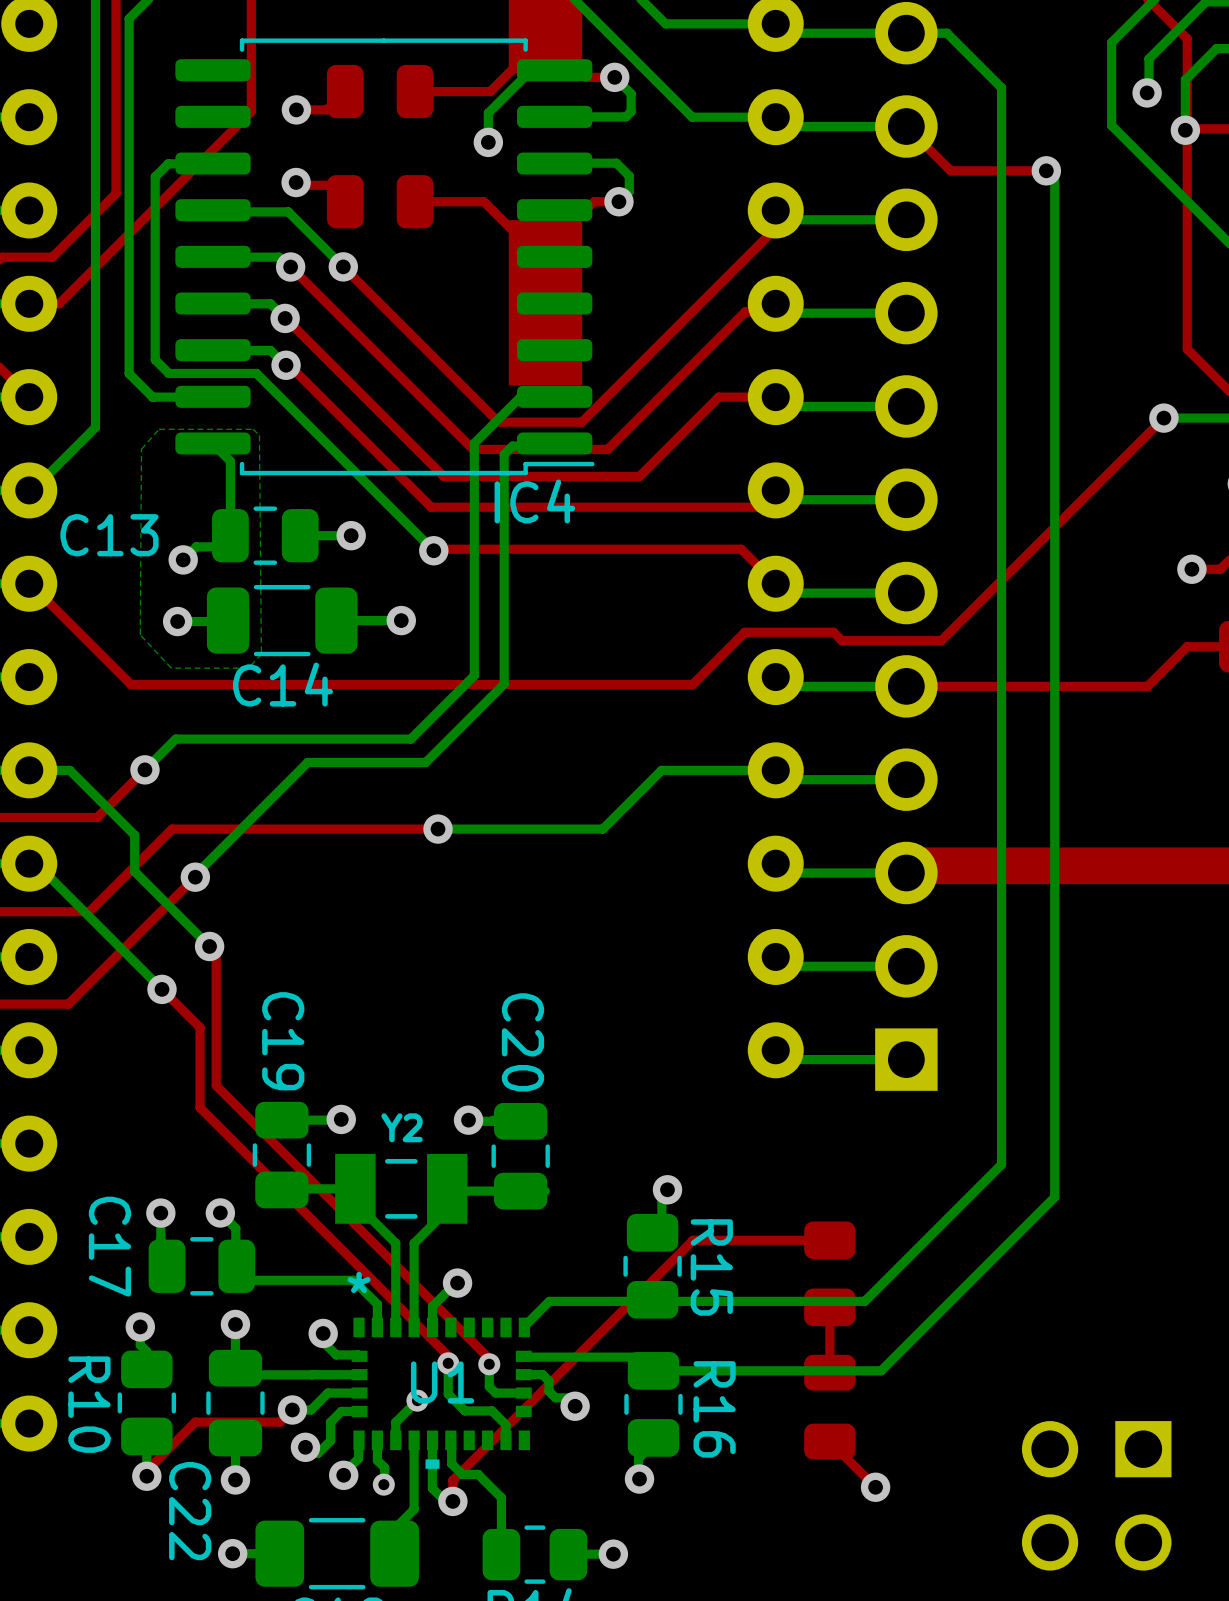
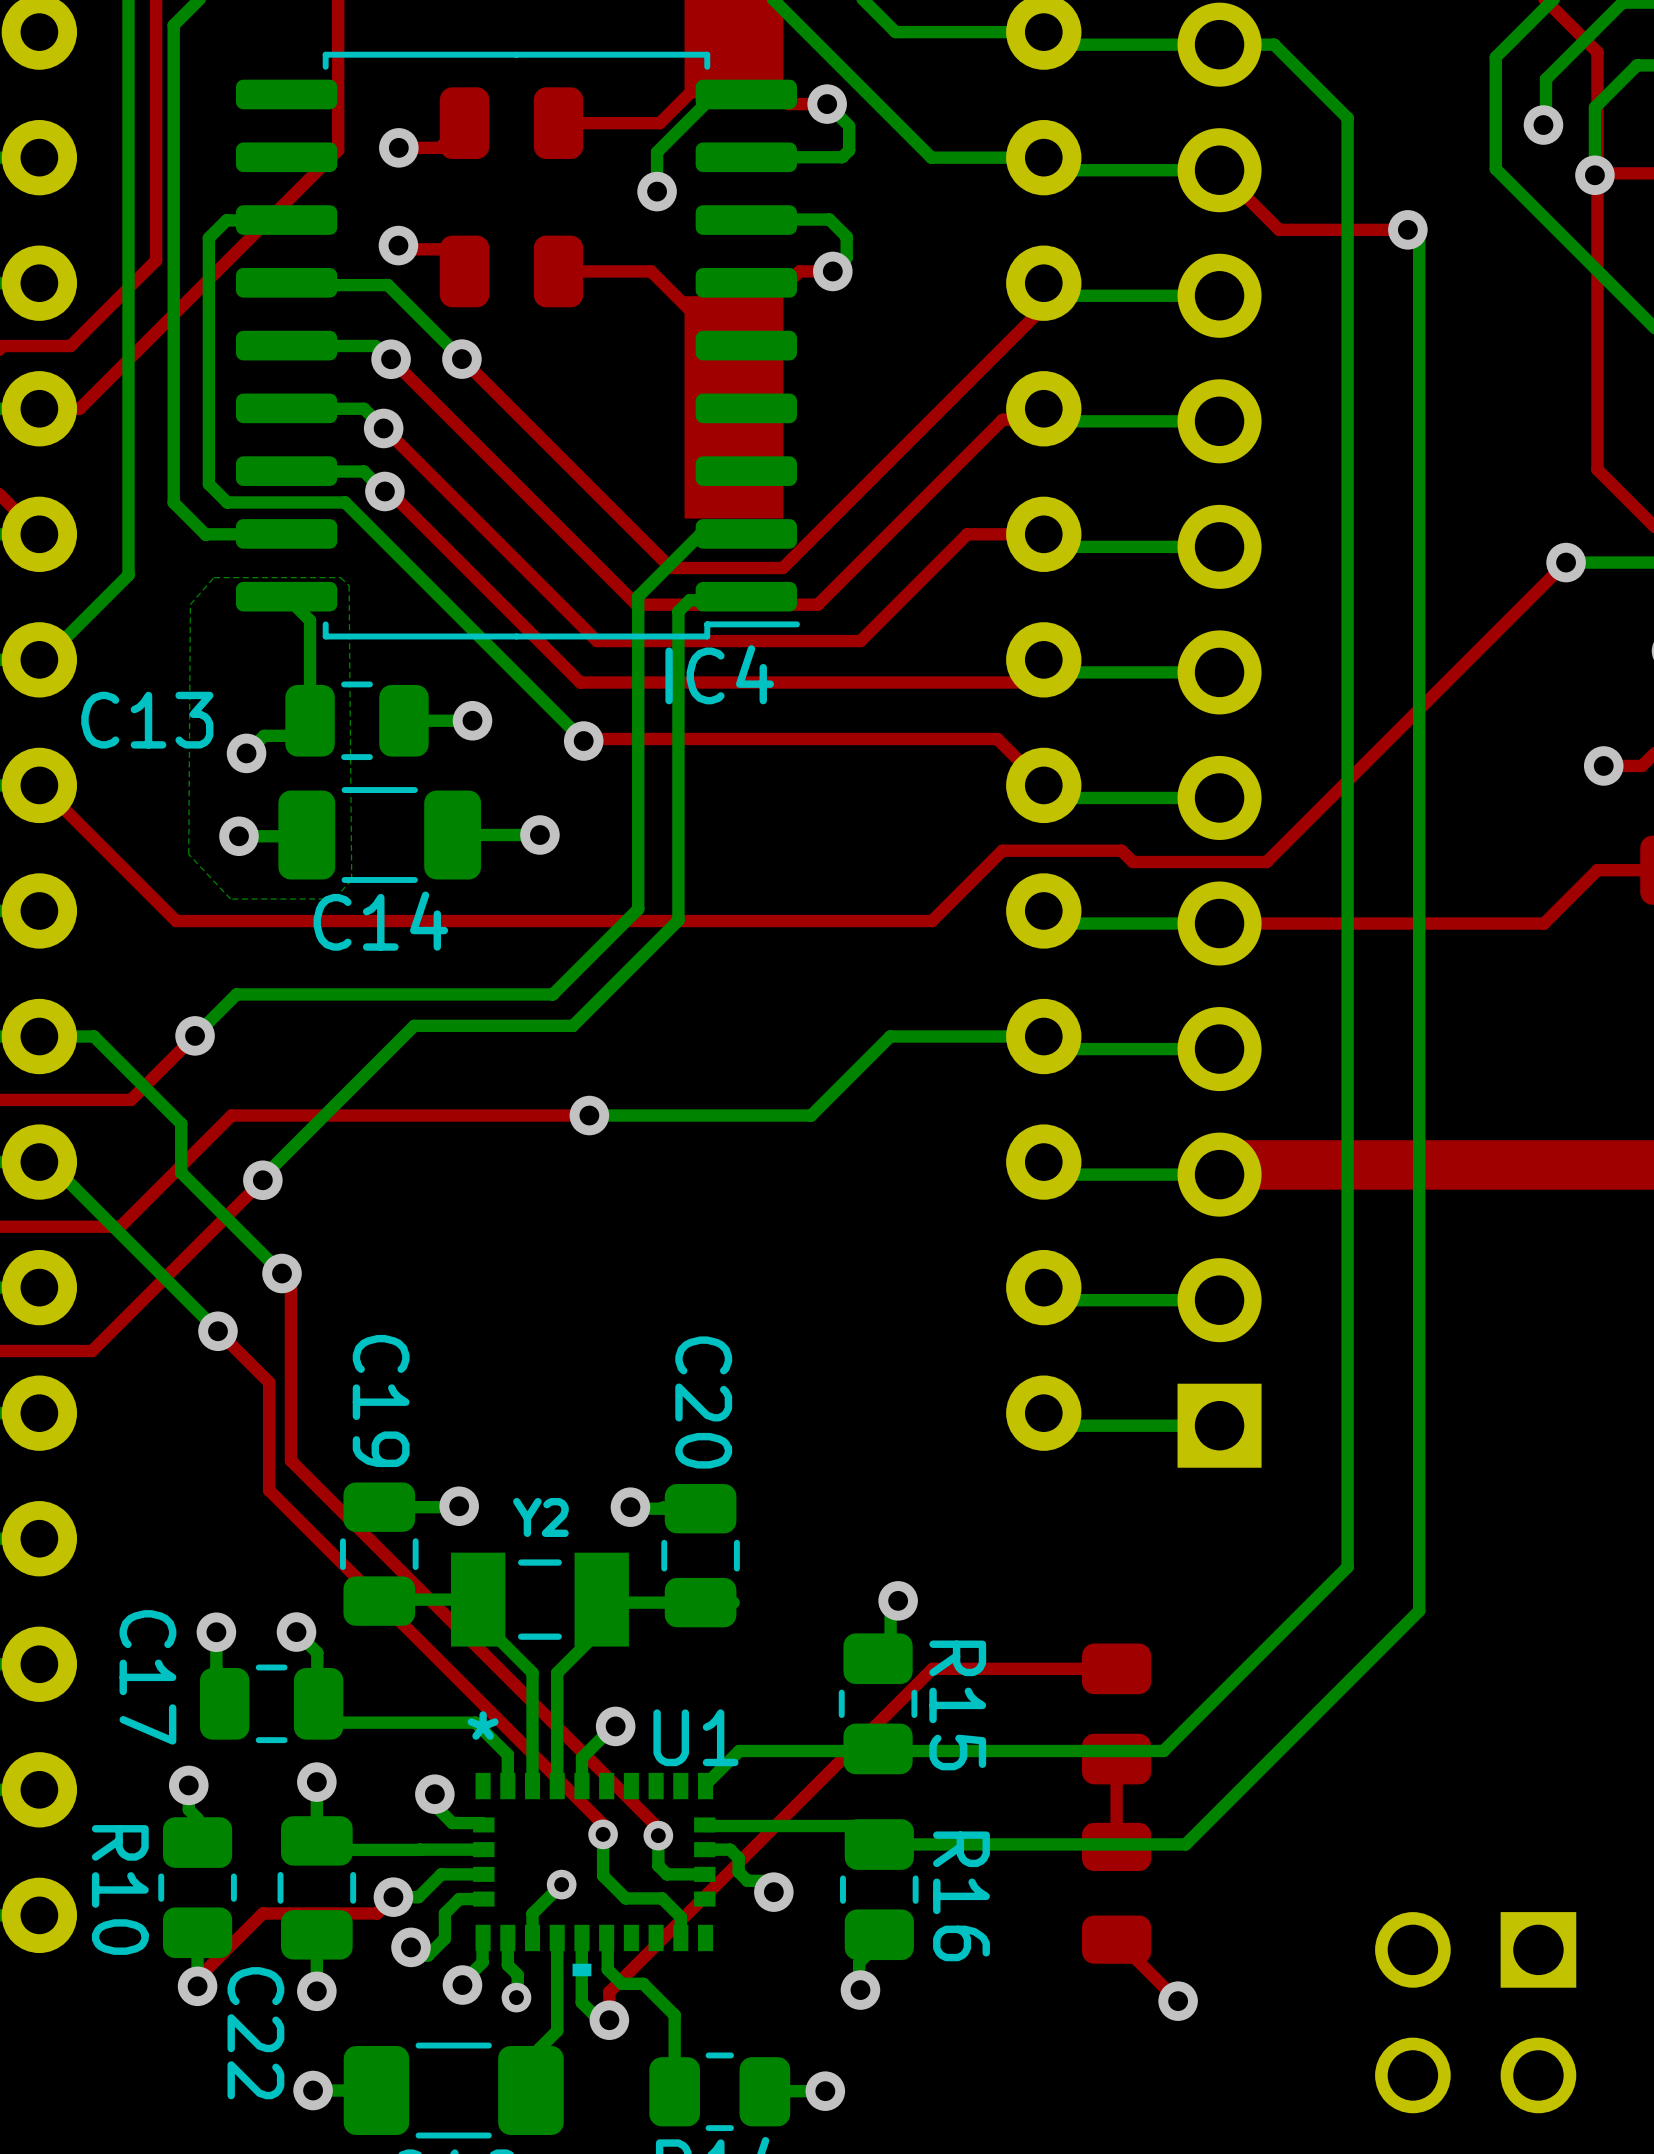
U1 name position: U1 (442, 1382) -> U1 (695, 1737)

